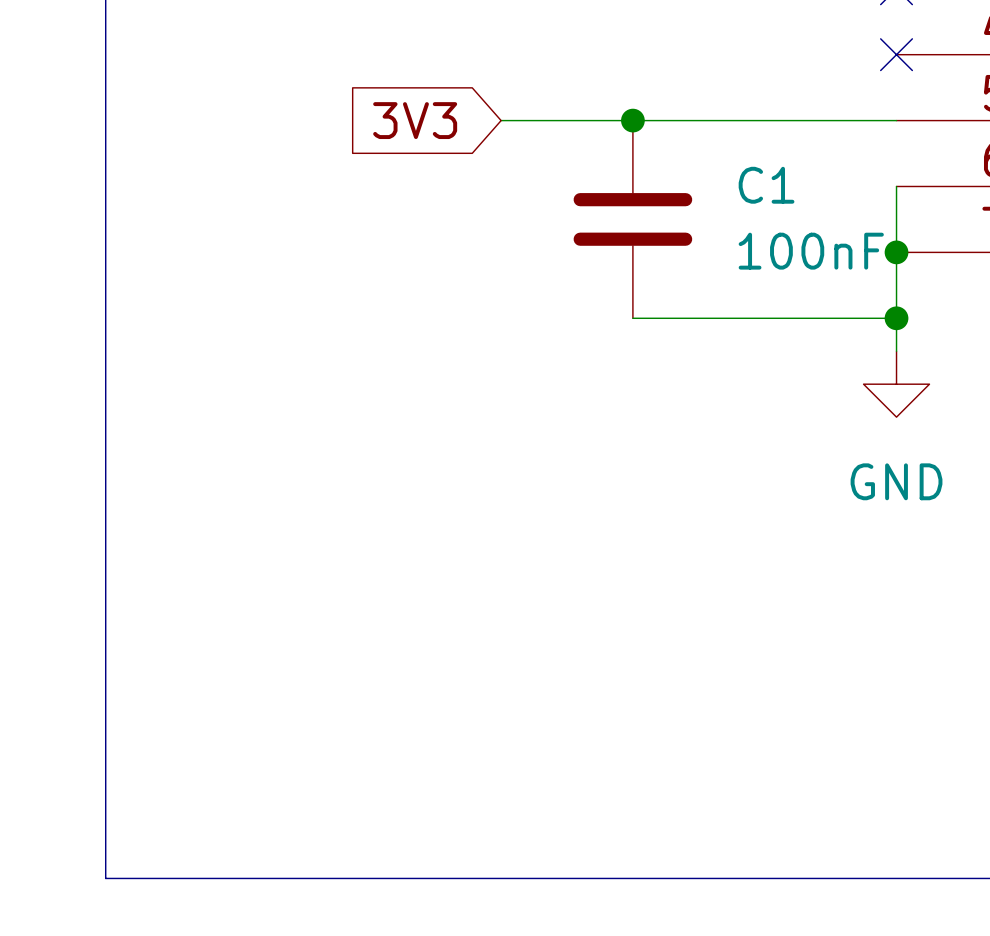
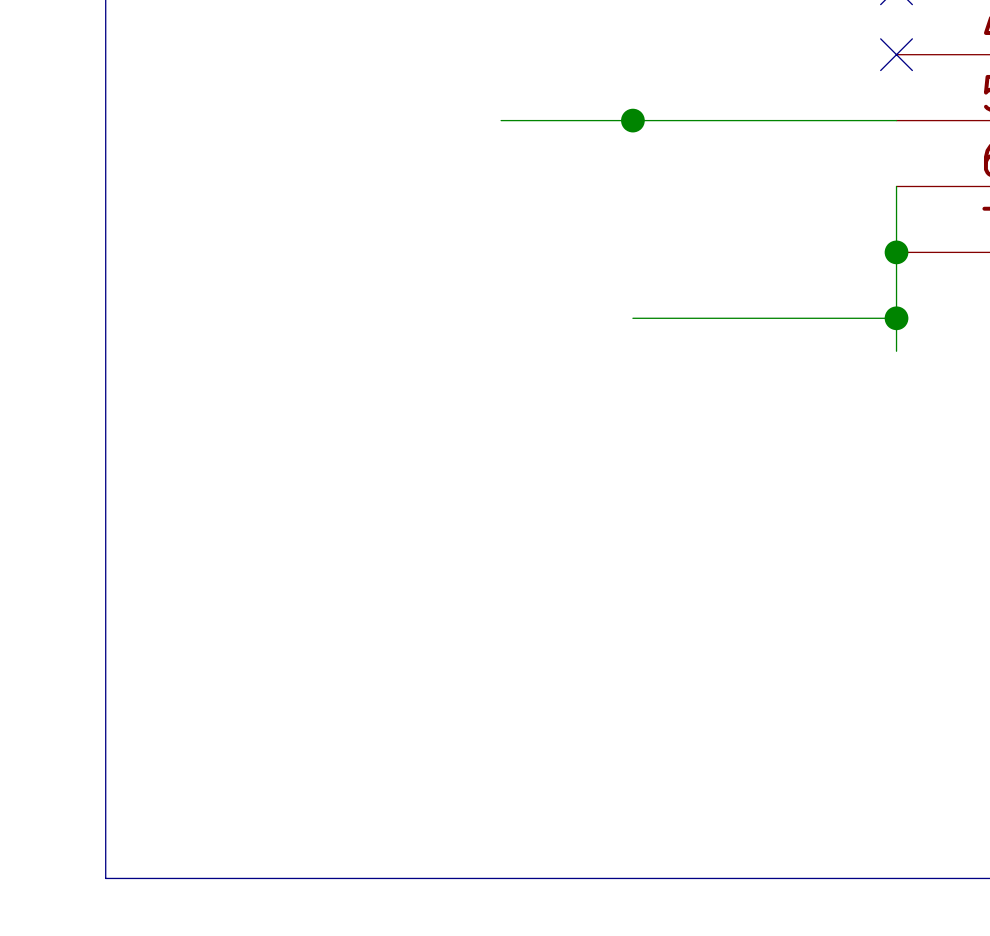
global label: 3V3 (415, 120) -> none
C1: 100nF (632, 219) -> none
power symbol: GND (896, 384) -> none

